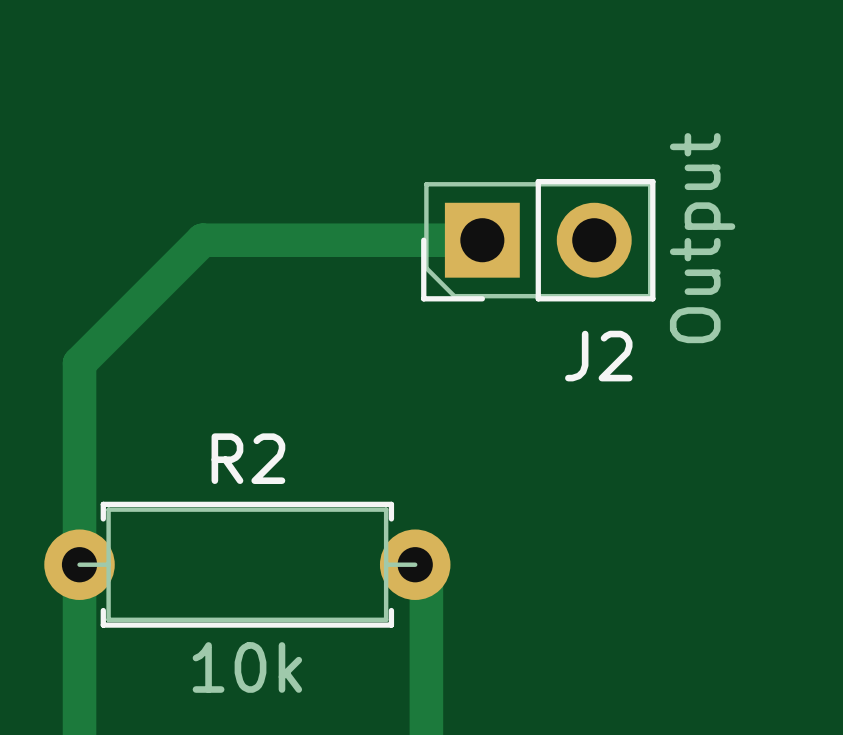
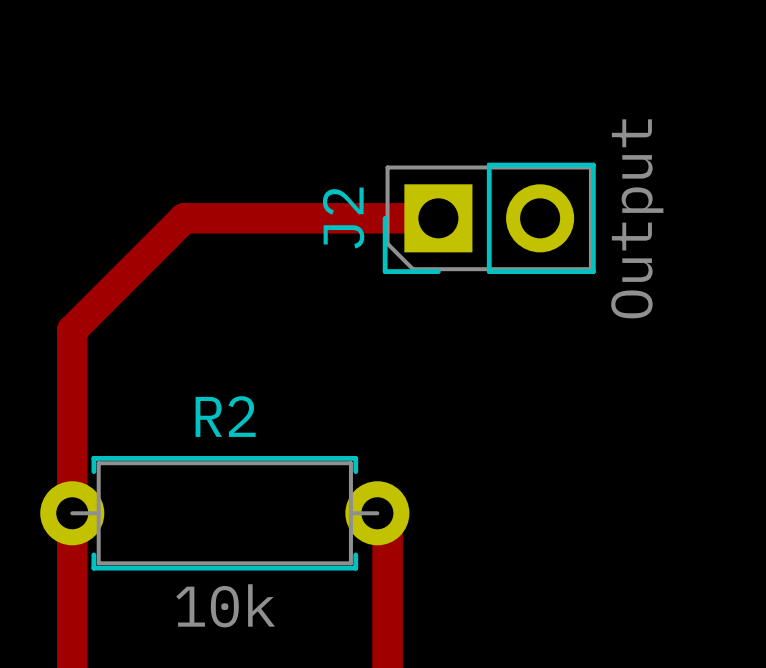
J2 name rotation: 0° (598, 356) -> 90° counterclockwise (343, 218)
J2 name position: J2 (598, 356) -> J2 (343, 218)

